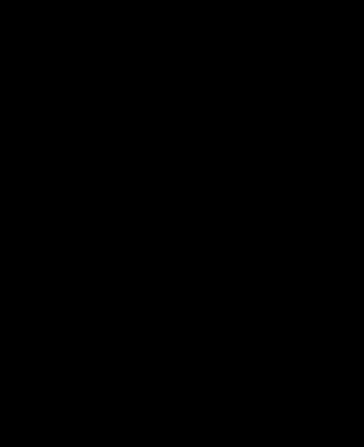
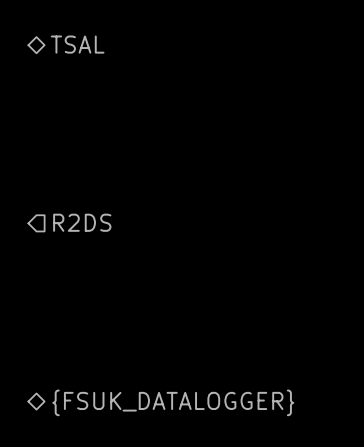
hierarchical label: none -> TSAL (77, 44)
hierarchical label: none -> R2DS (82, 222)
hierarchical label: none -> {FSUK_DATALOGGER} (173, 402)

